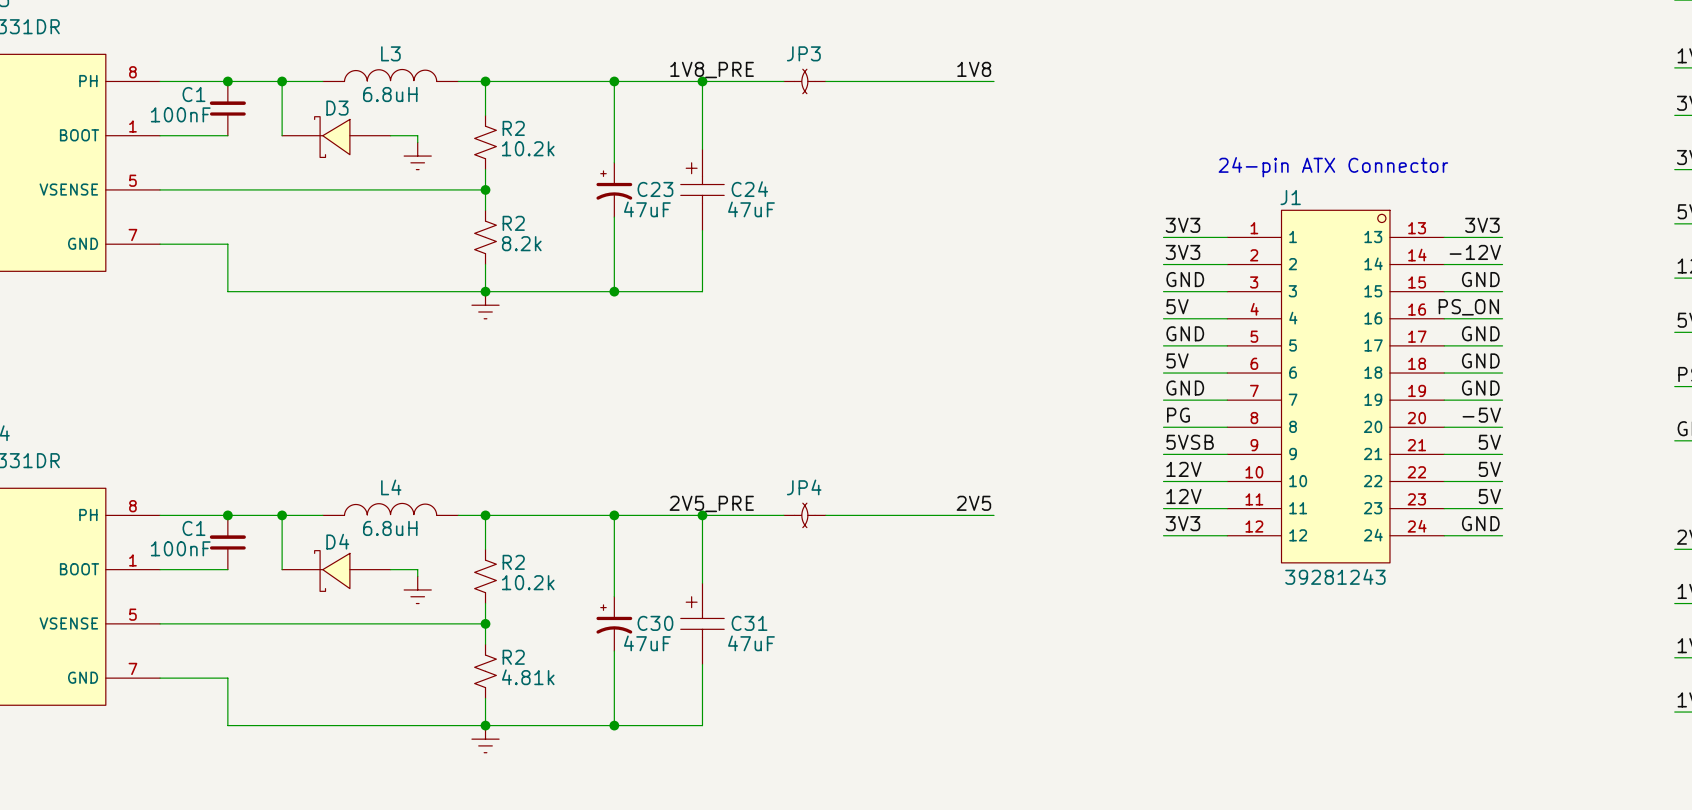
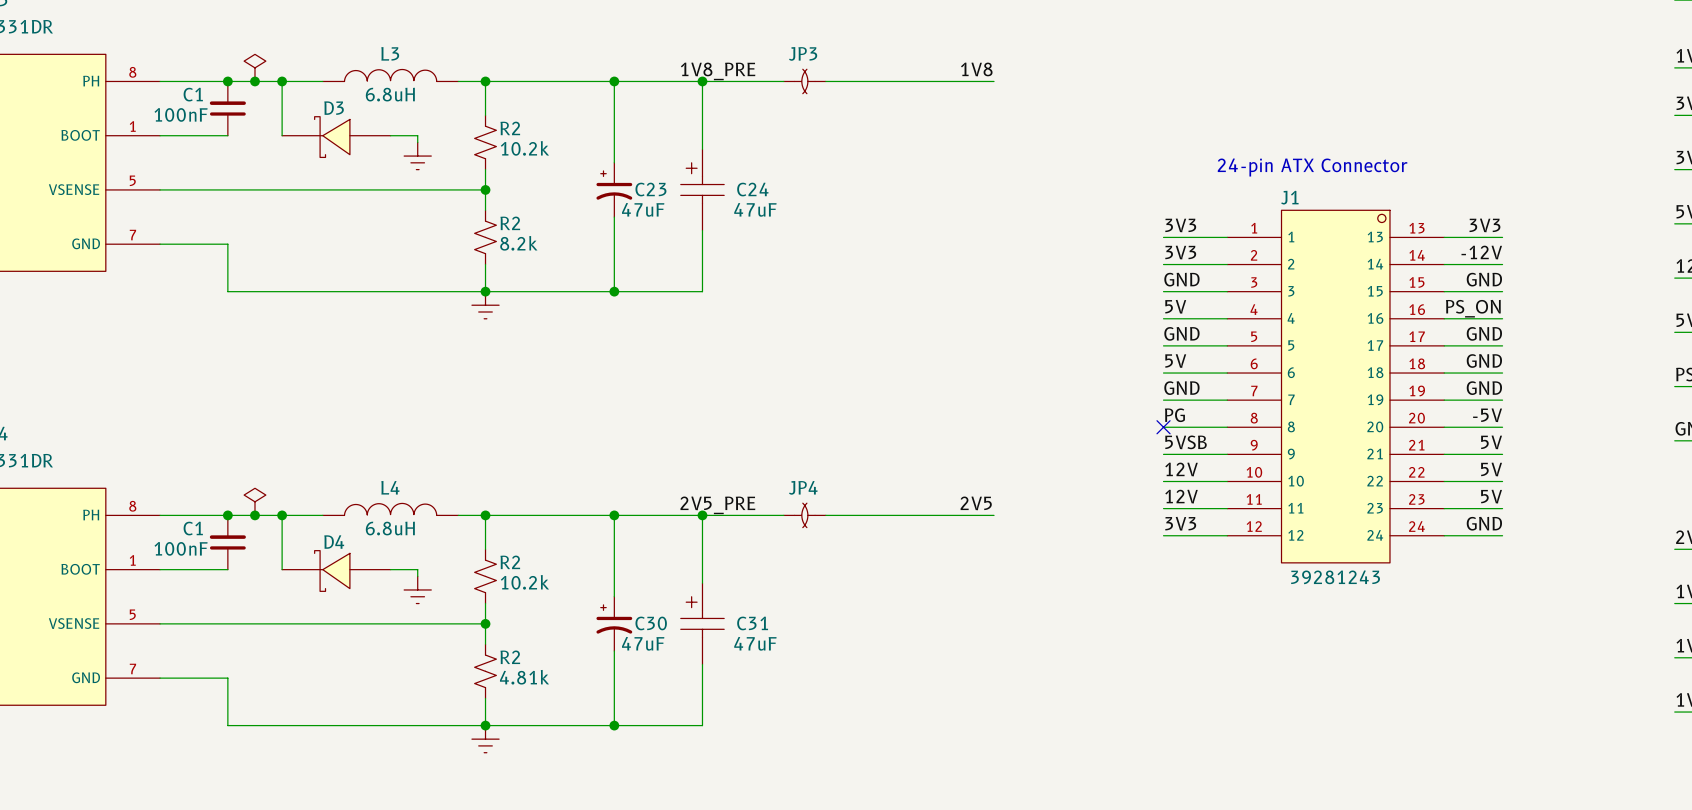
power symbol: none -> (254, 67)
junction: none -> (254, 81)
no-connect mark: none -> (1163, 427)
power symbol: none -> (254, 501)
junction: none -> (254, 515)

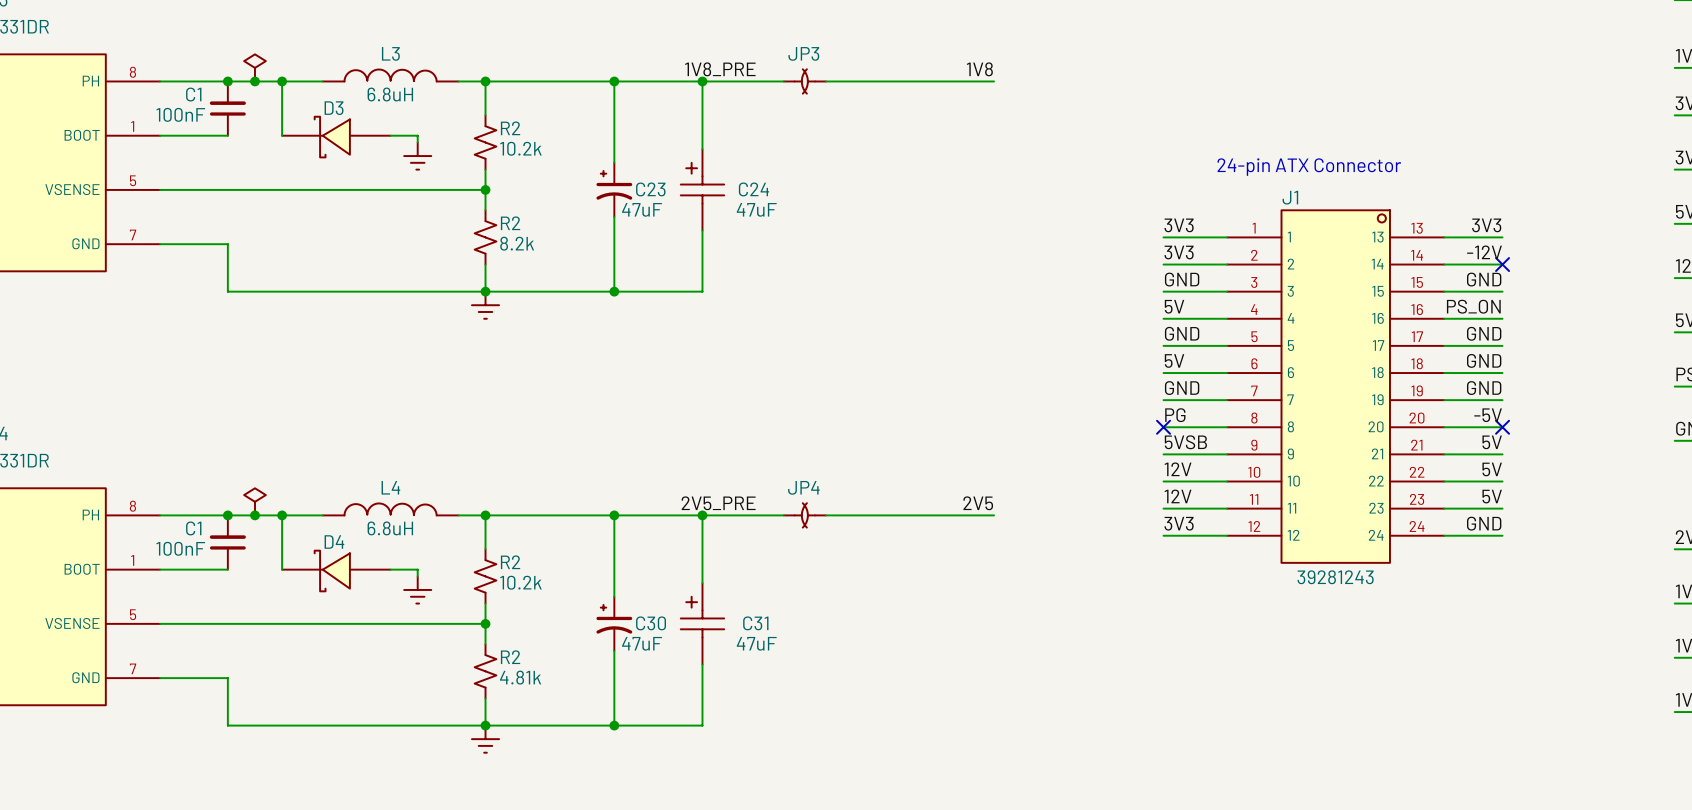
L3 flip: as is (390, 75) -> left-right (390, 75)
no-connect mark: none -> (1502, 264)
no-connect mark: none -> (1502, 427)
L4 flip: as is (390, 509) -> left-right (390, 509)

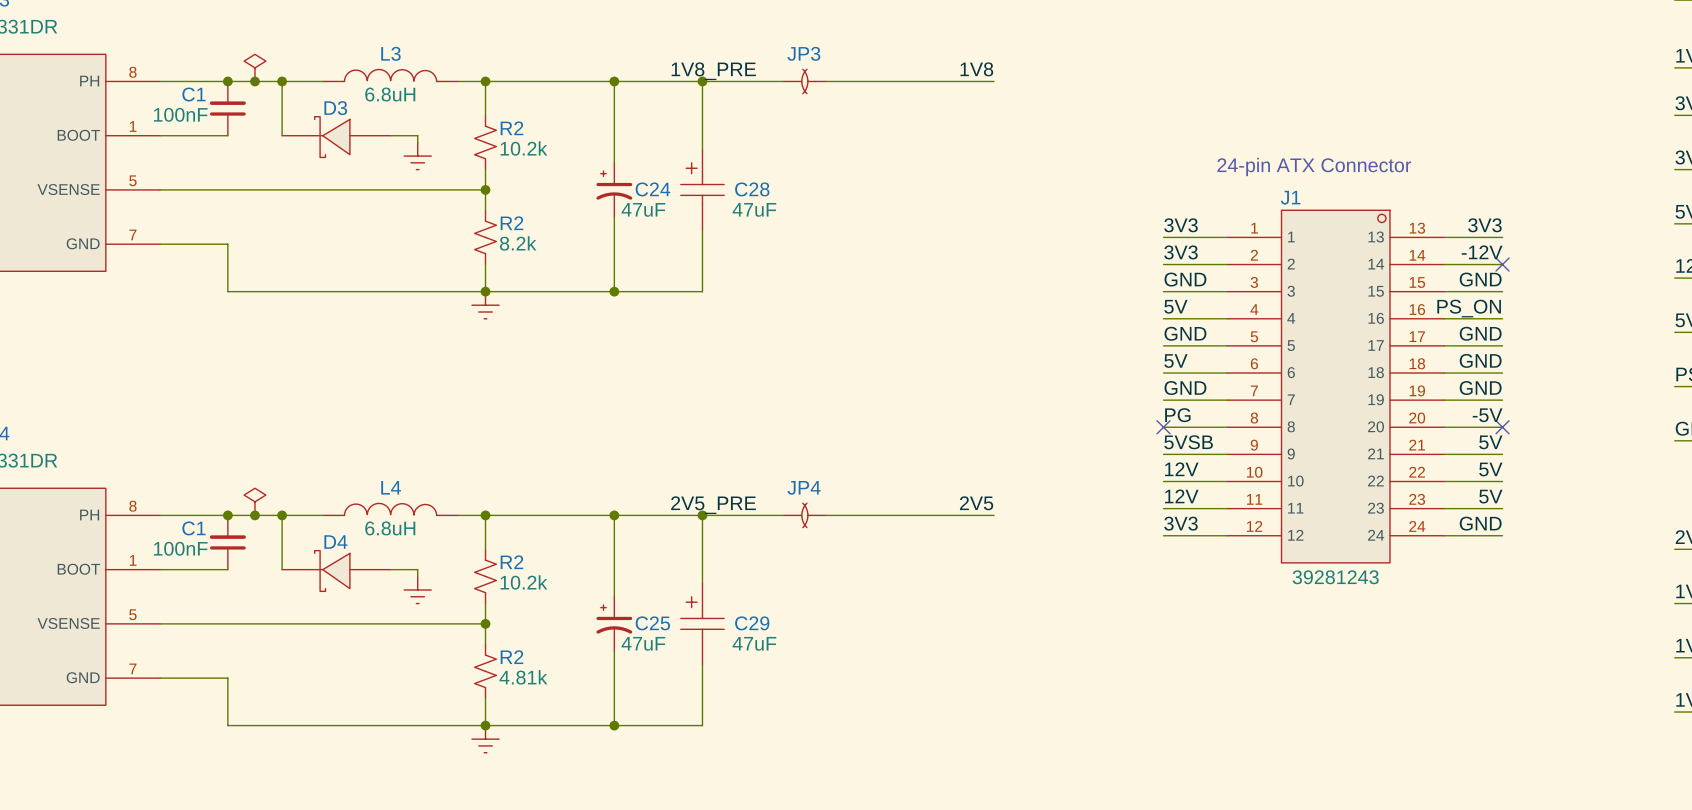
C23 name: C23 (650, 189) -> C24 (652, 189)
C24 name: C24 (753, 189) -> C28 (752, 189)
C30 name: C30 (651, 623) -> C25 (652, 623)
C31 name: C31 (755, 623) -> C29 (752, 623)

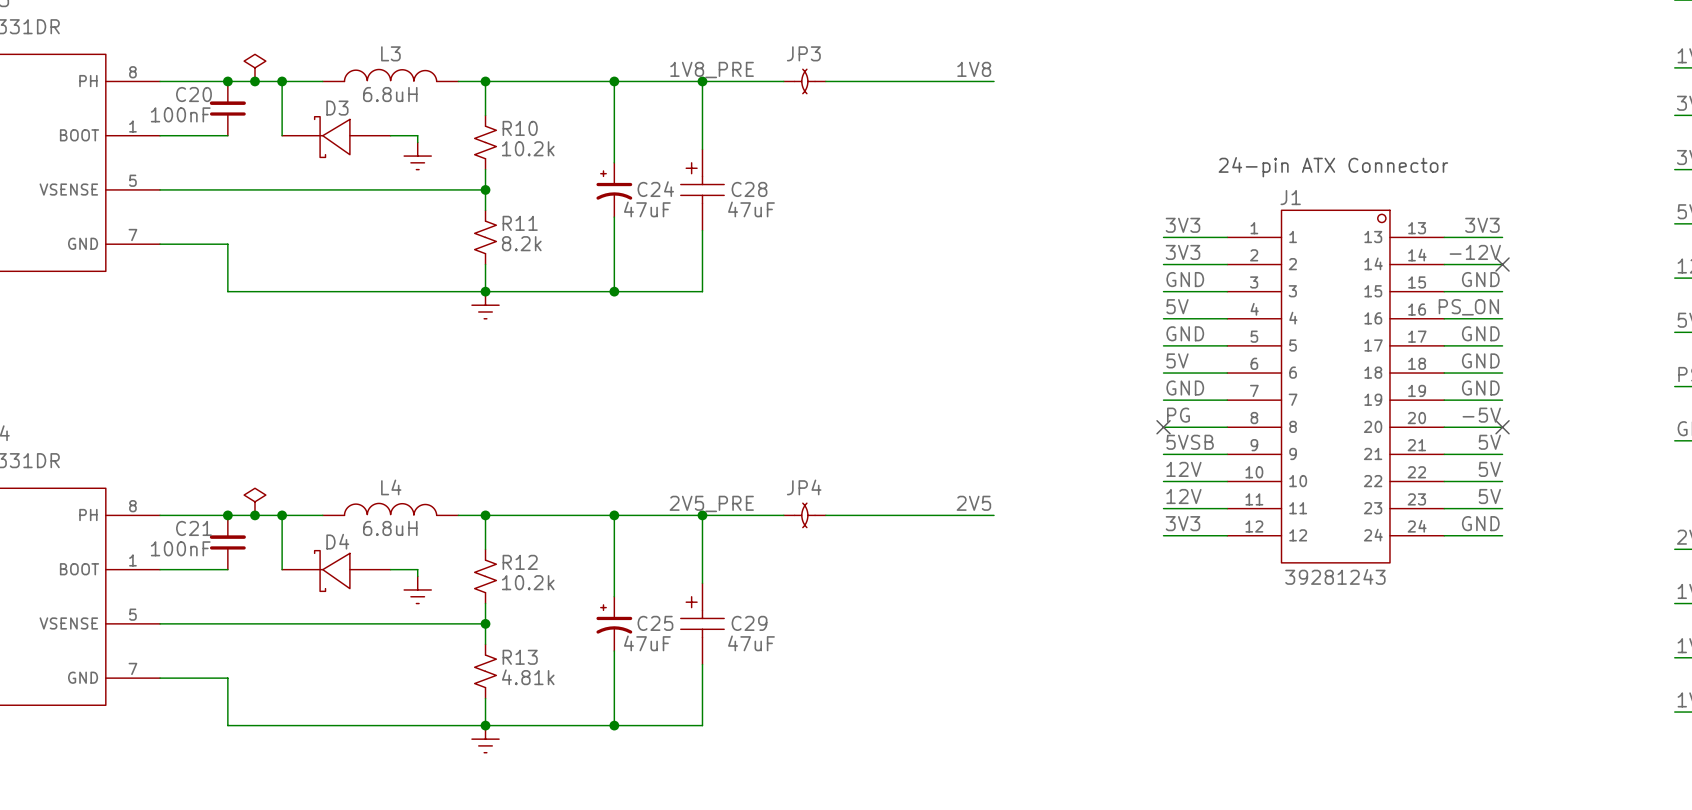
C1 name: C1 (193, 94) -> C20 (193, 94)
R2 name: R2 (511, 128) -> R10 (520, 128)
R2 name: R2 (511, 223) -> R11 (520, 223)
C1 name: C1 (193, 528) -> C21 (193, 528)
R2 name: R2 (511, 562) -> R12 (520, 562)
R2 name: R2 (511, 657) -> R13 (520, 657)

